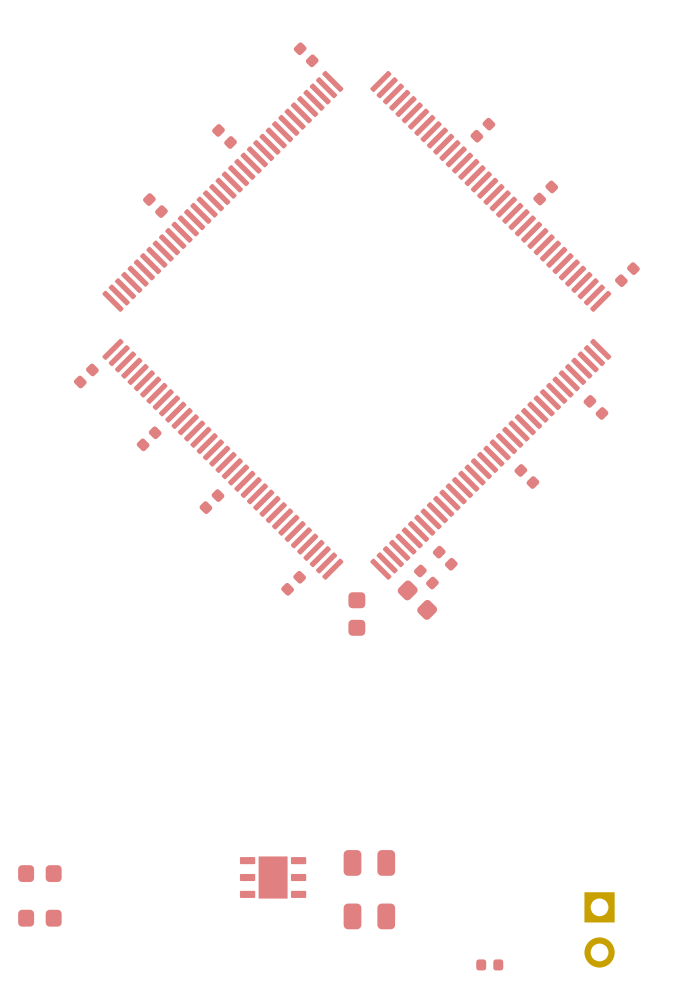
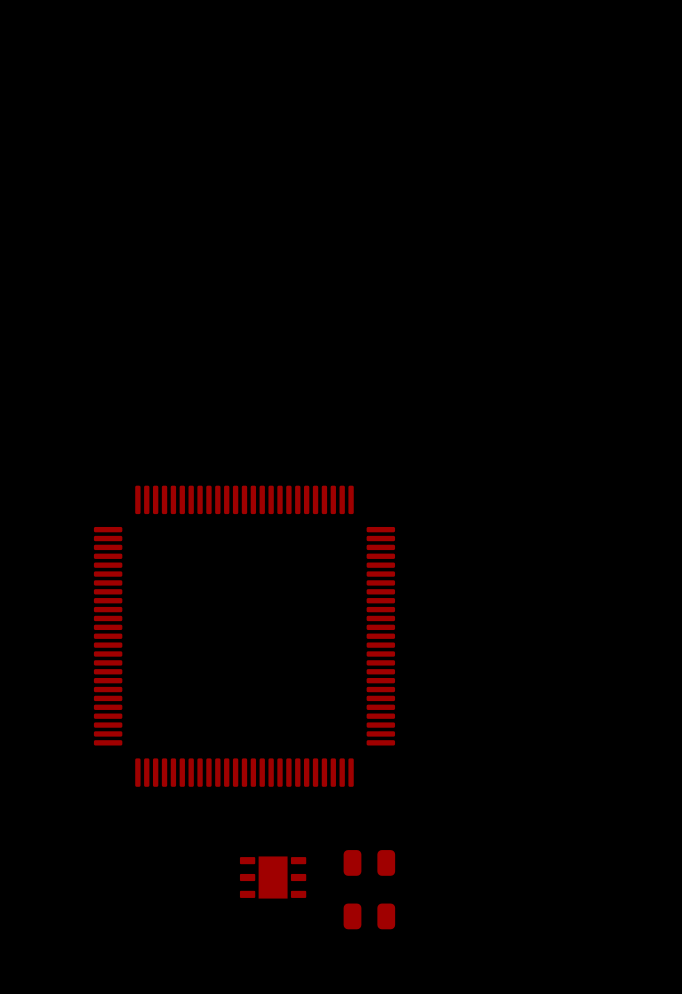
part: (306, 54) -> none
part: (482, 130) -> none
part: (224, 136) -> none
part: (545, 192) -> none
part: (155, 205) -> none
part: (627, 274) -> none
part: (356, 325) -> none
part: (86, 376) -> none
part: (595, 407) -> none
part: (149, 438) -> none
part: (526, 476) -> none
part: (211, 501) -> none
part: (445, 558) -> none
part: (426, 577) -> none
part: (293, 583) -> none
part: (417, 600) -> none
part: (356, 614) -> none
part: none -> (244, 636)
part: (39, 873) -> none
part: (39, 918) -> none
part: (599, 929) -> none
part: (489, 964) -> none

